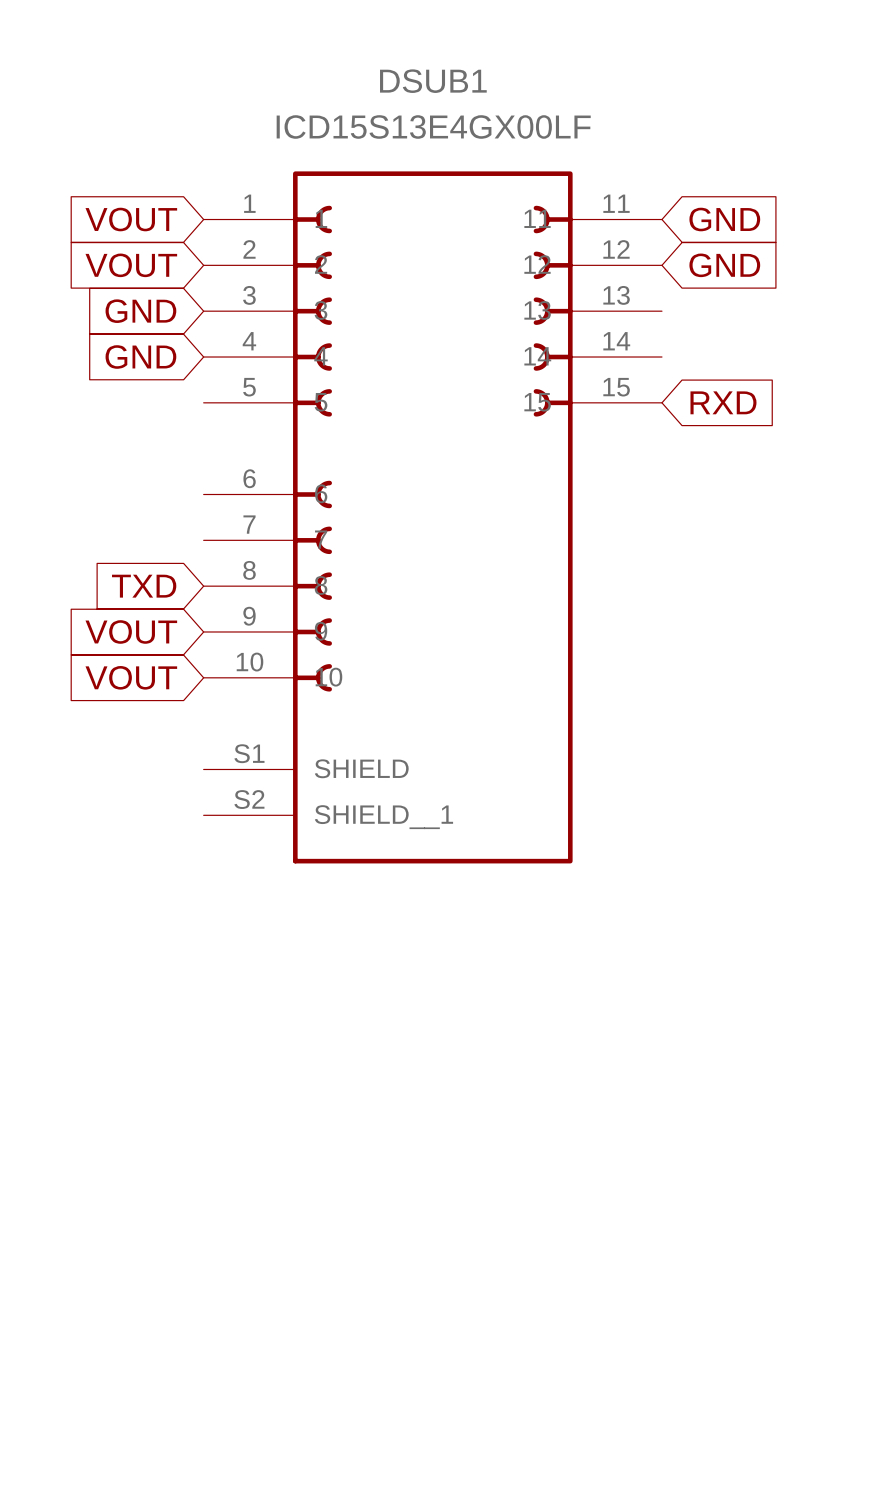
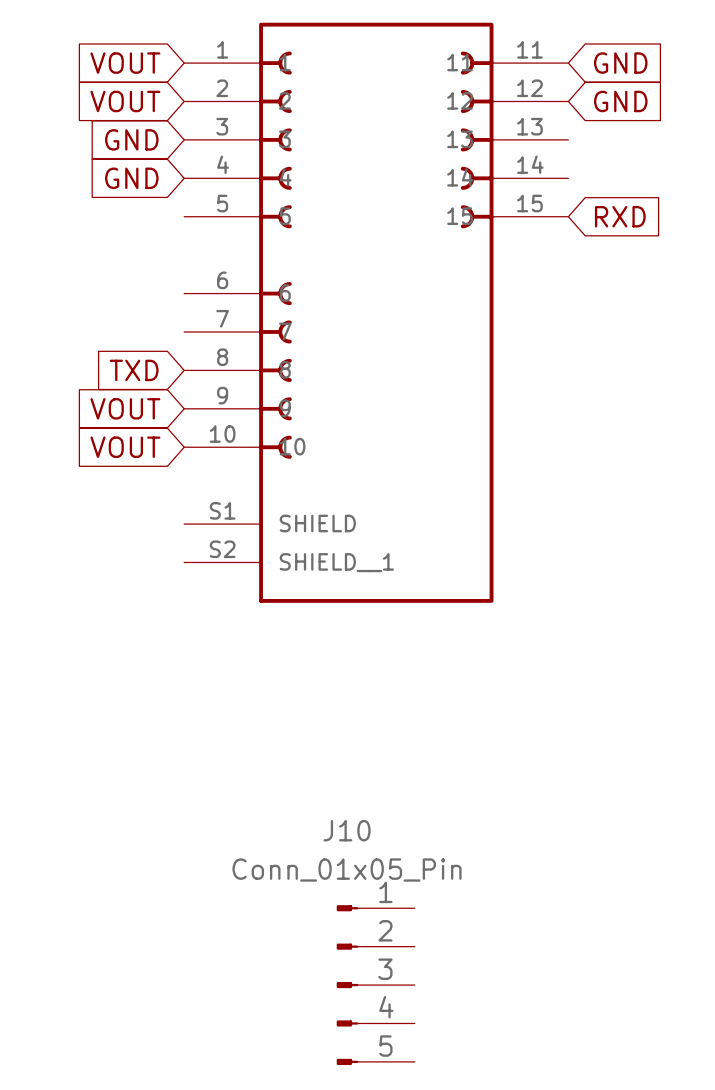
J10: none -> Conn_01x05_Pin (375, 985)

